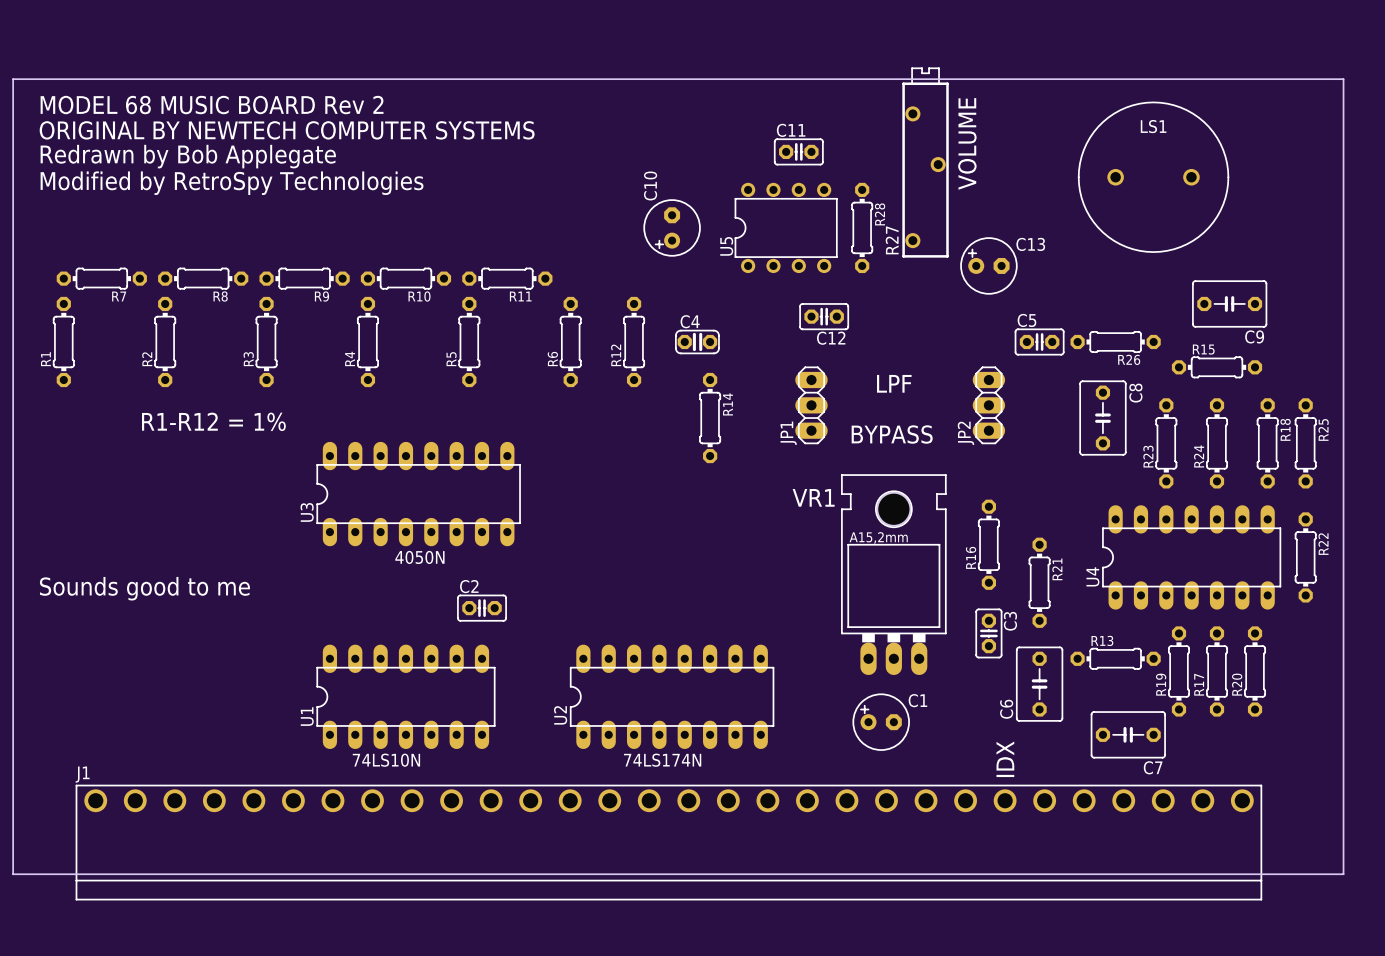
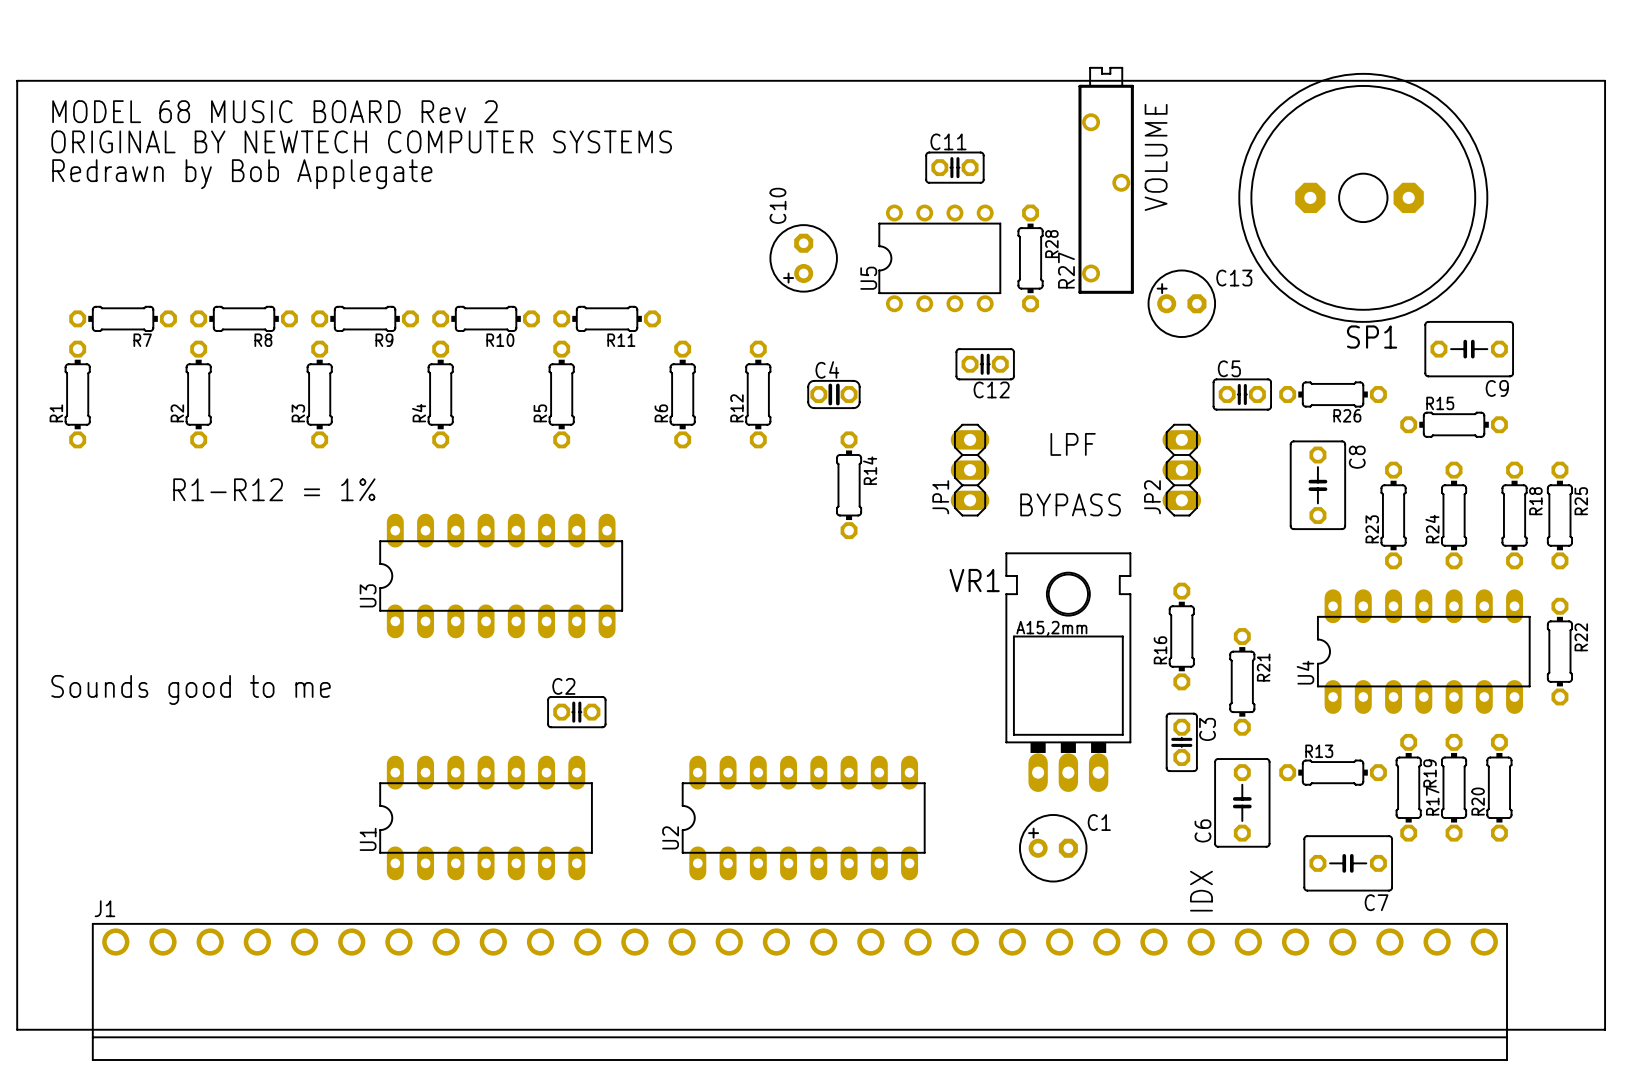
SP1: none -> (1363, 197)
LS1: (1153, 177) -> none
text: Modified by RetroSpy Technologies (232, 183) -> none
U3 value: 4050N (419, 557) -> none
R19 name position: R19 (1161, 684) -> R19 (1430, 773)
U1 value: 74LS10N (386, 760) -> none
U2 value: 74LS174N (662, 760) -> none

